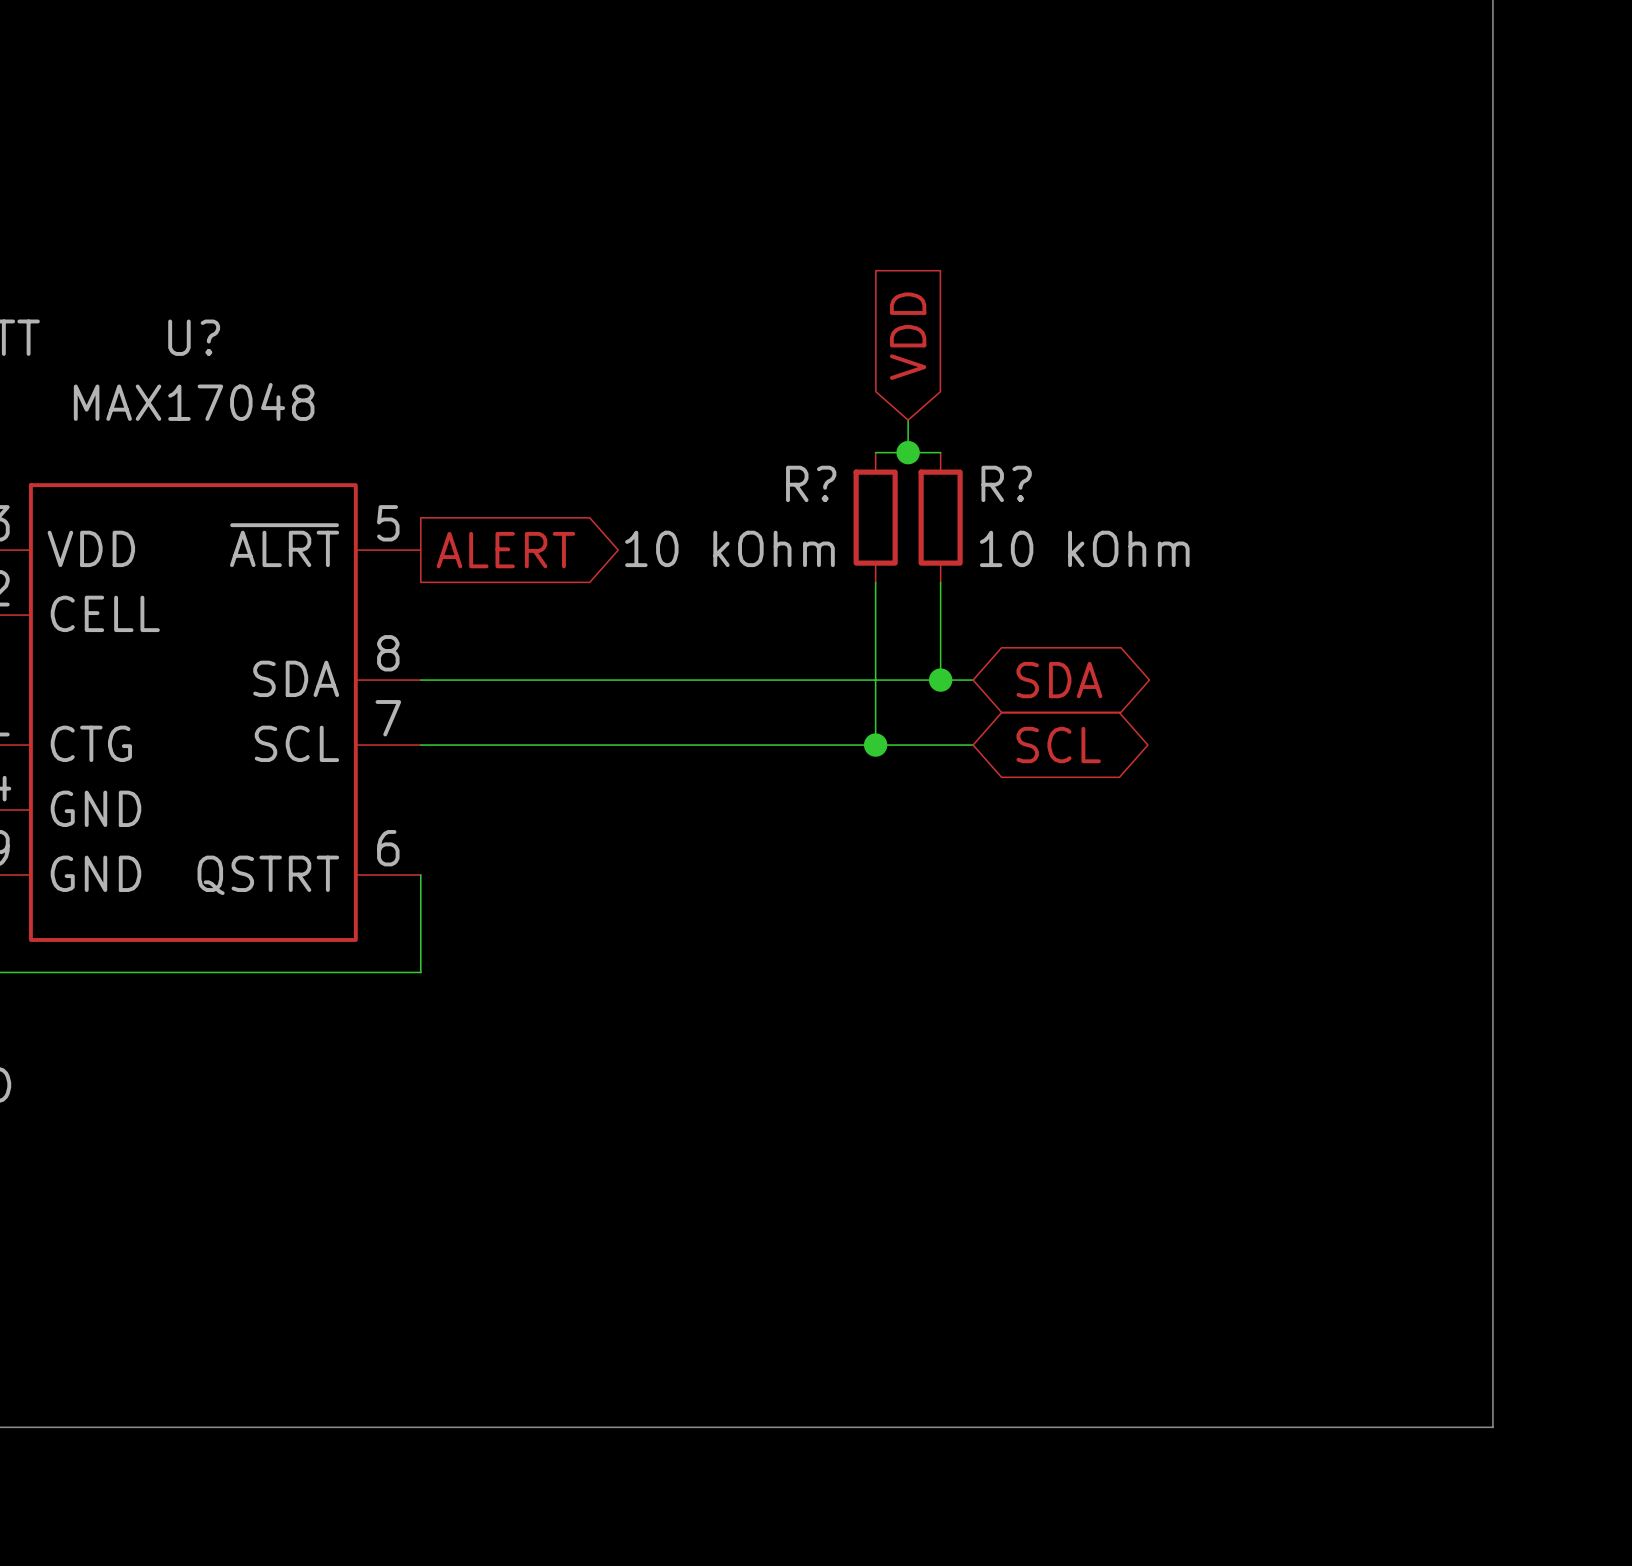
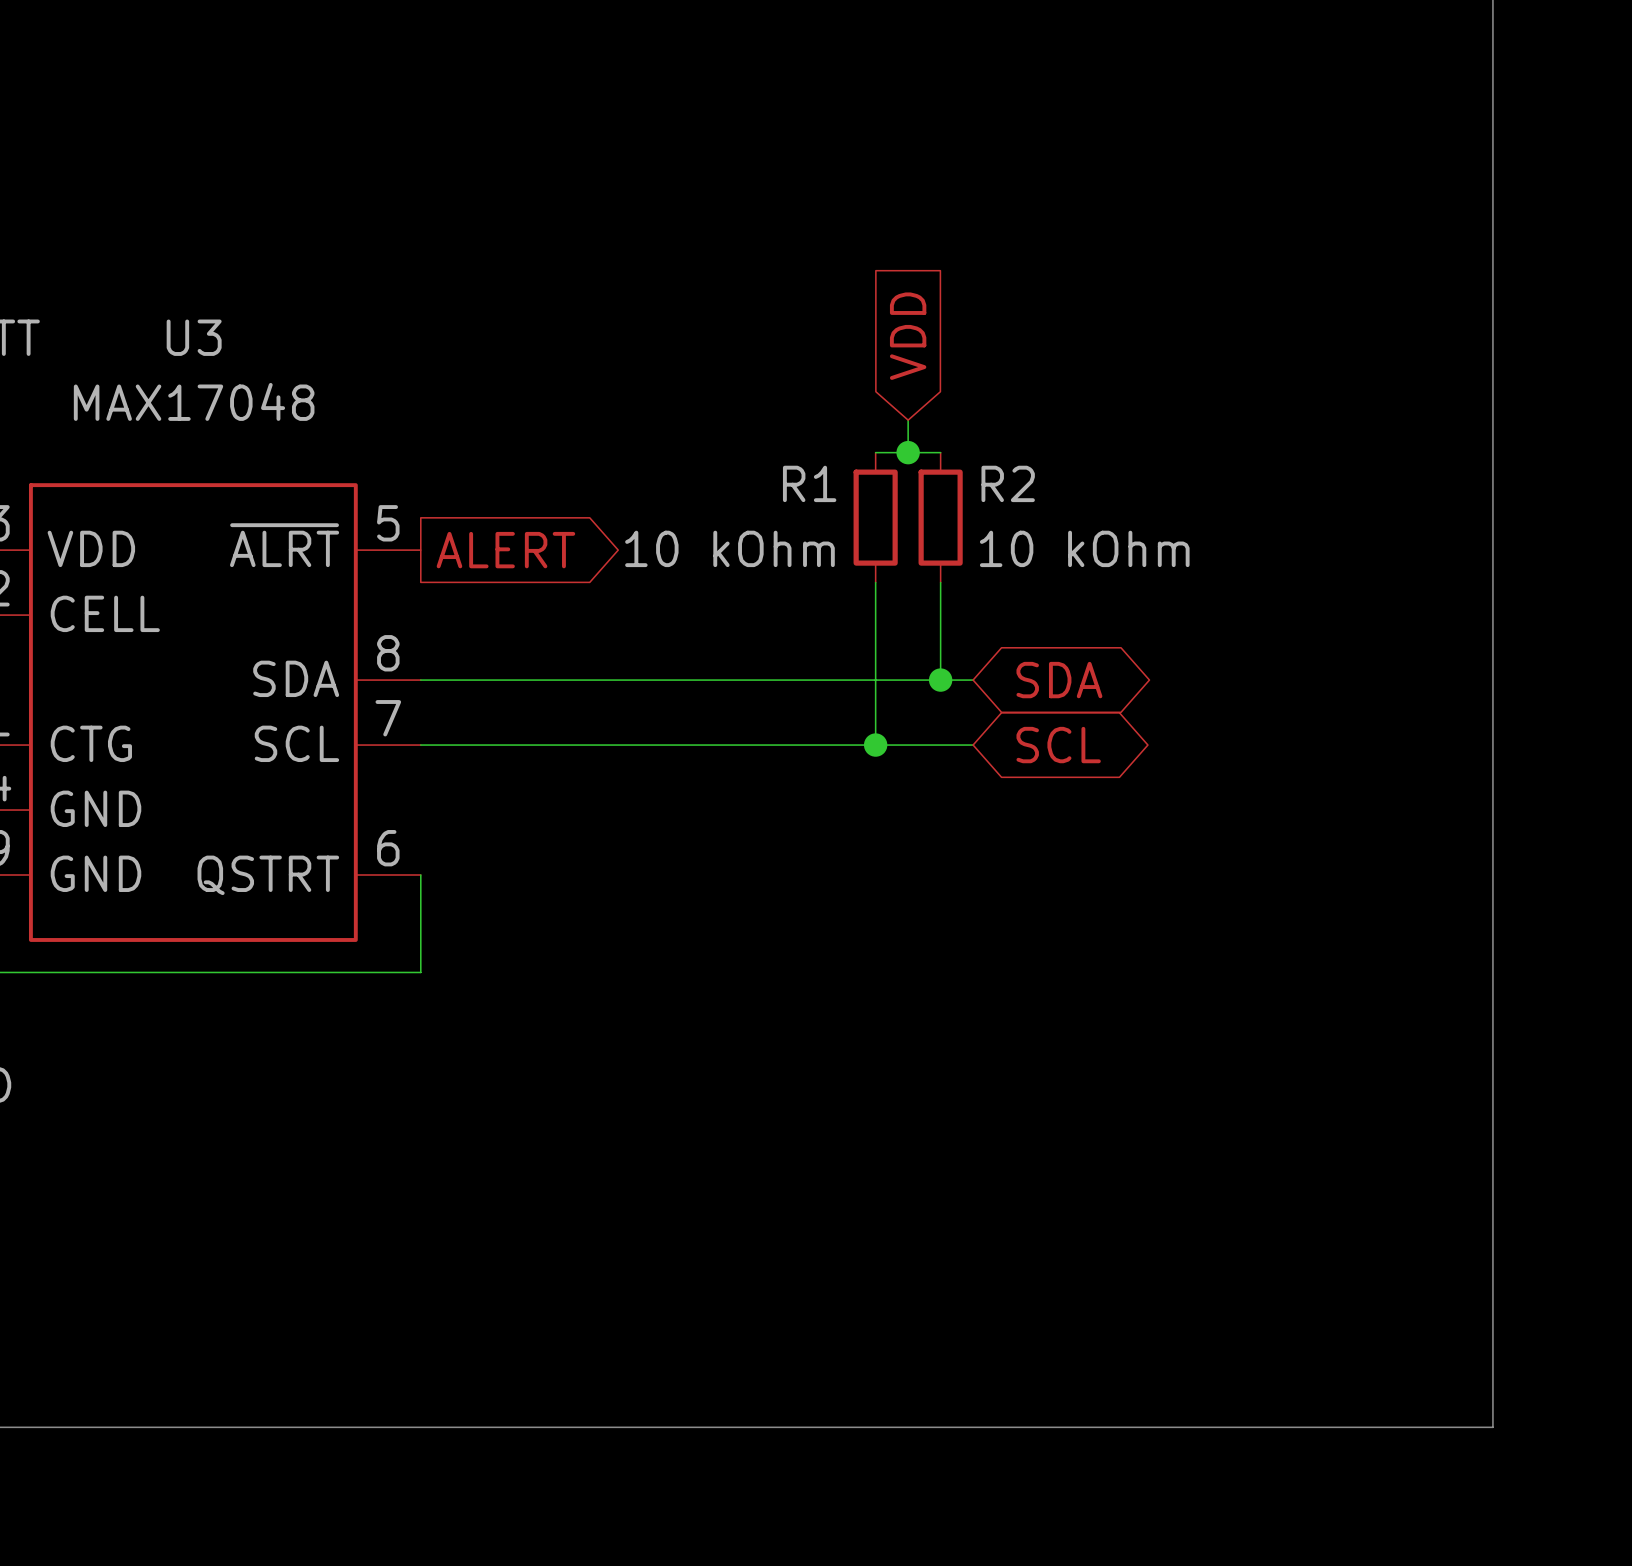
U? name: U? (194, 337) -> U3 (194, 337)
R? name: R? (811, 483) -> R1 (809, 483)
R? name: R? (1006, 483) -> R2 (1008, 483)

